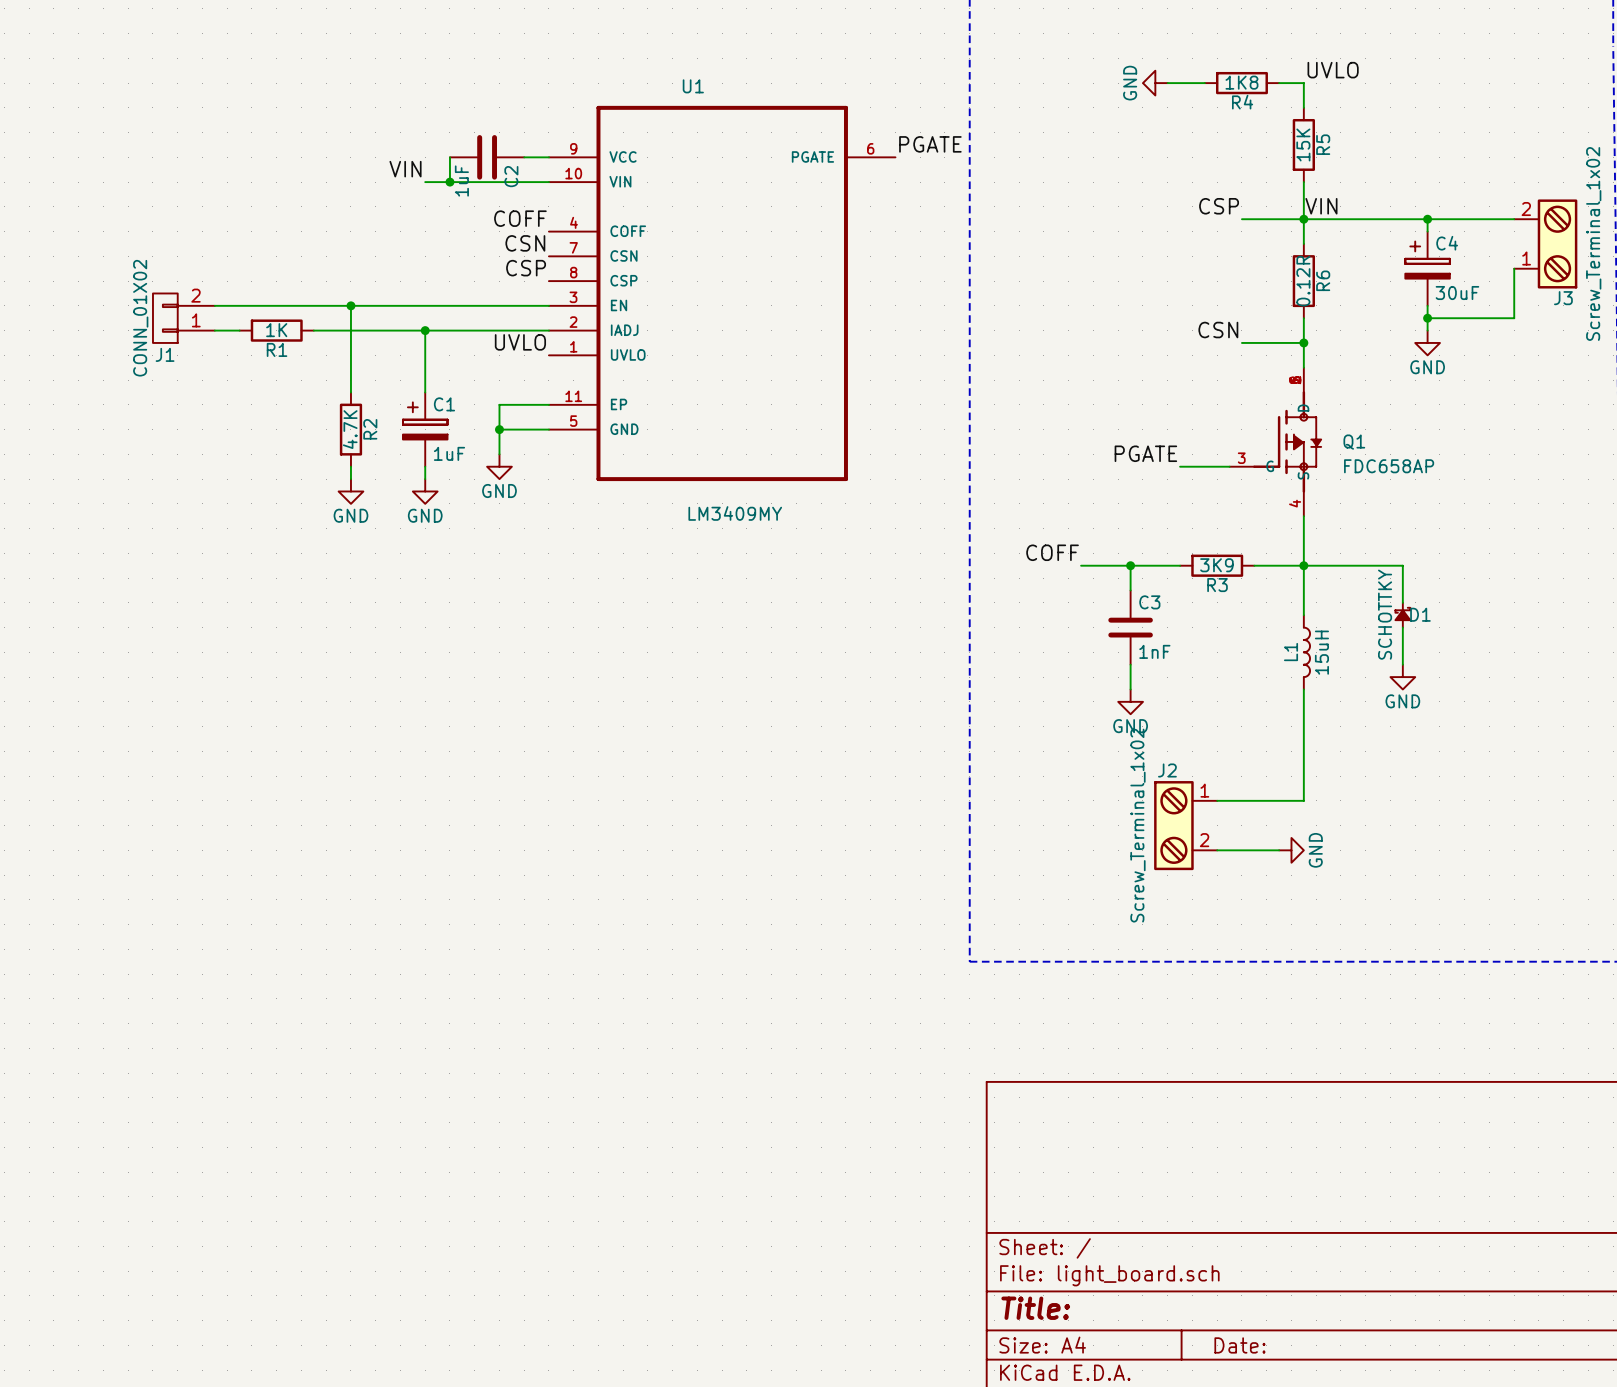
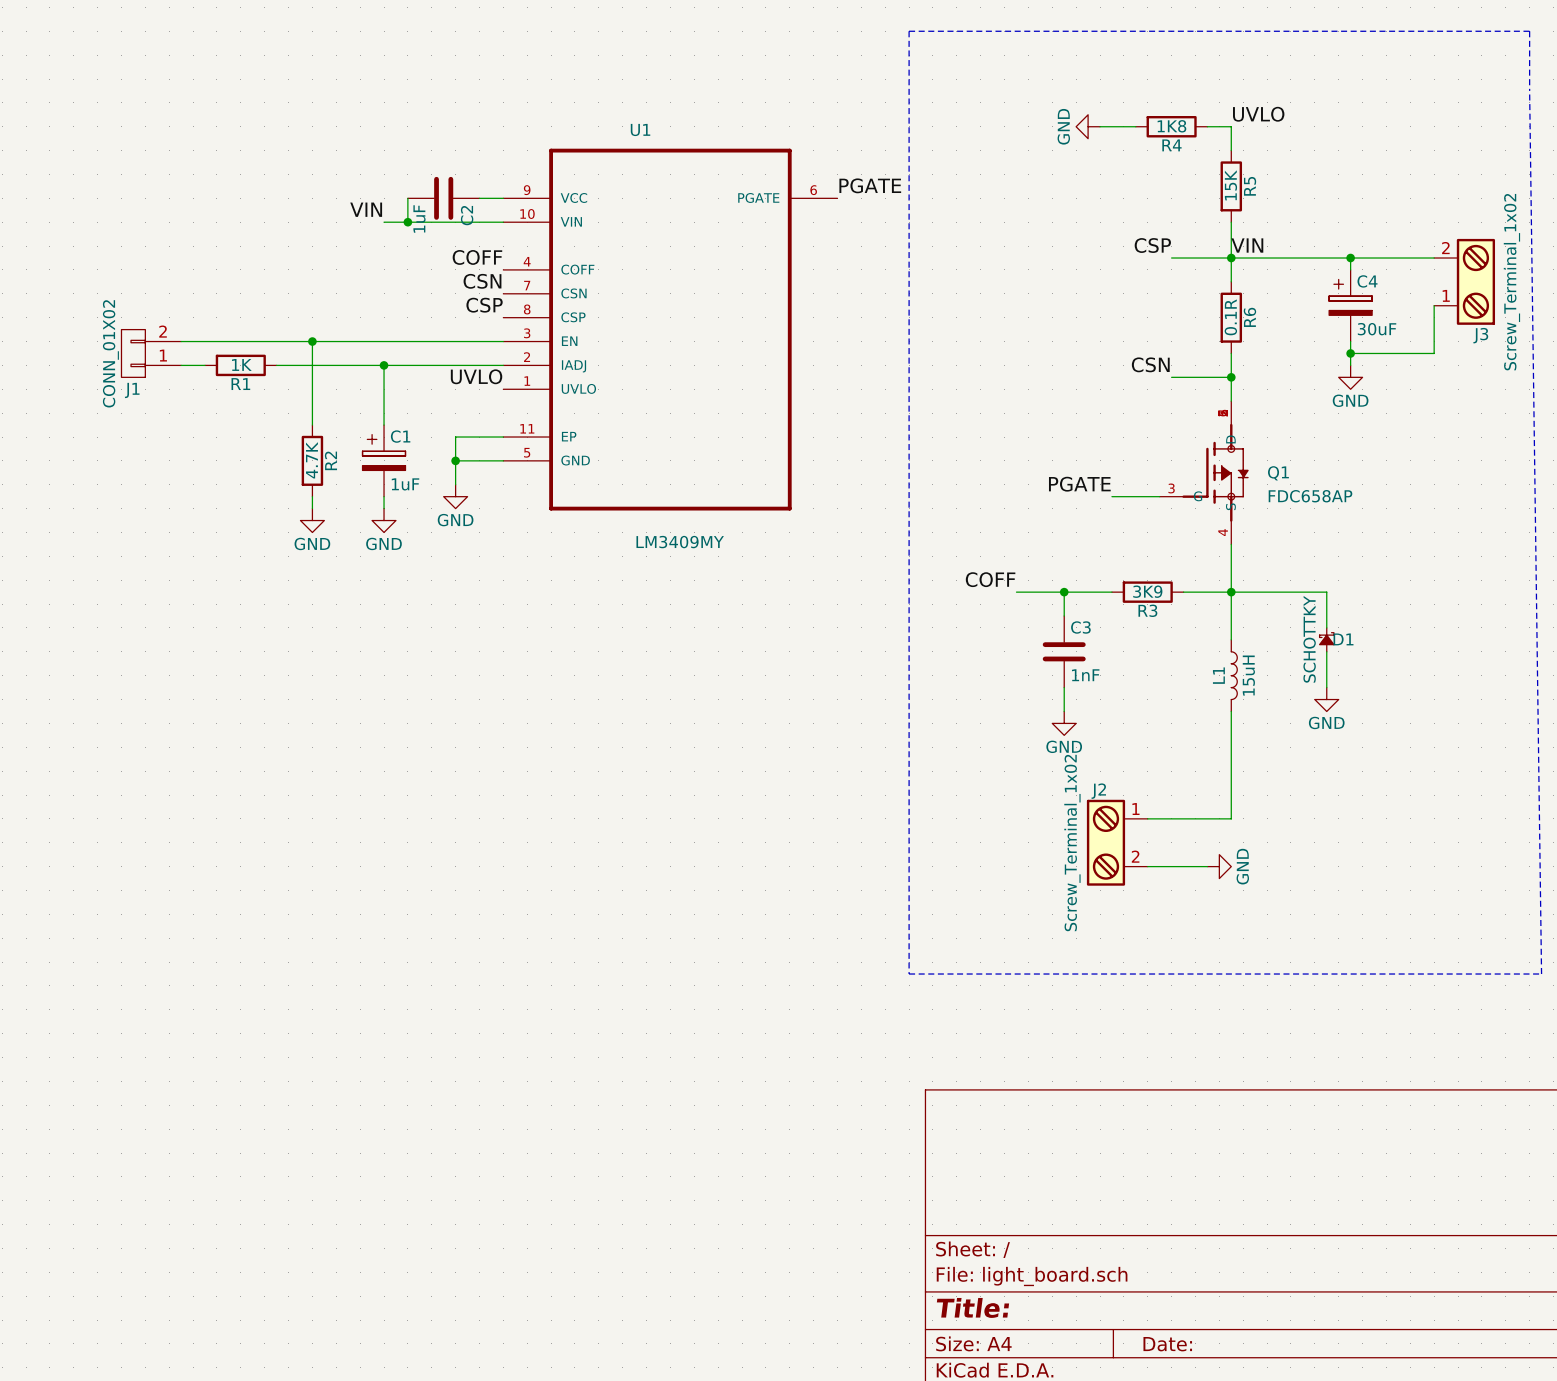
R6 value: 0.12R (1303, 281) -> 0.1R (1230, 317)

